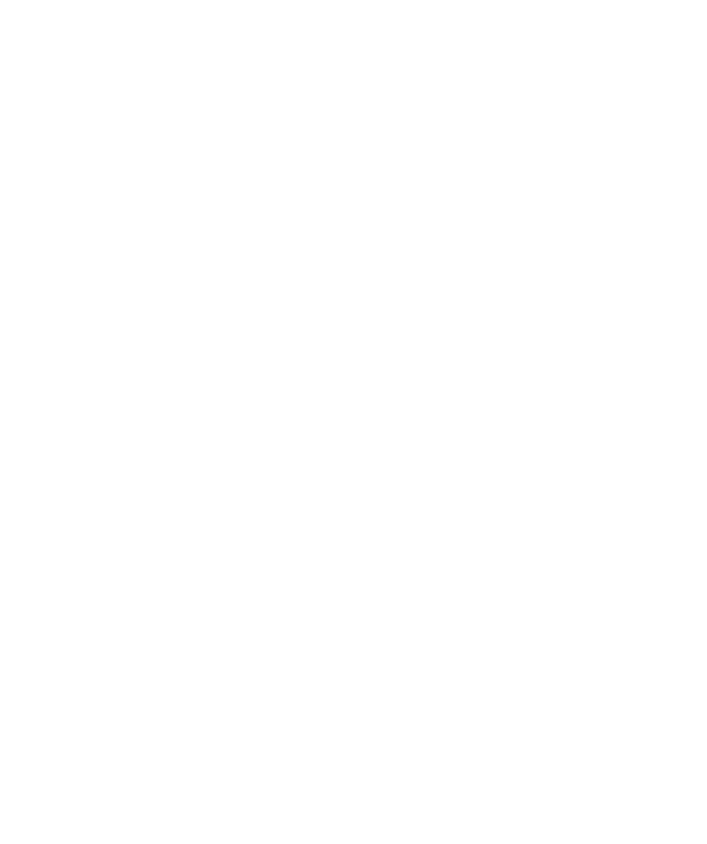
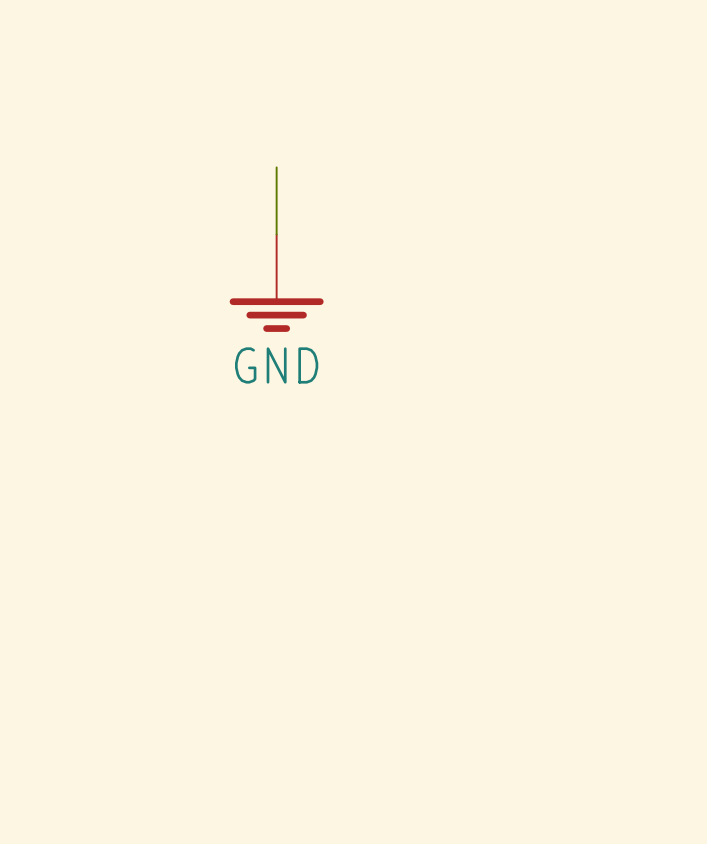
wire: none -> (276, 167) (276, 234)
power symbol: none -> GND (276, 283)

